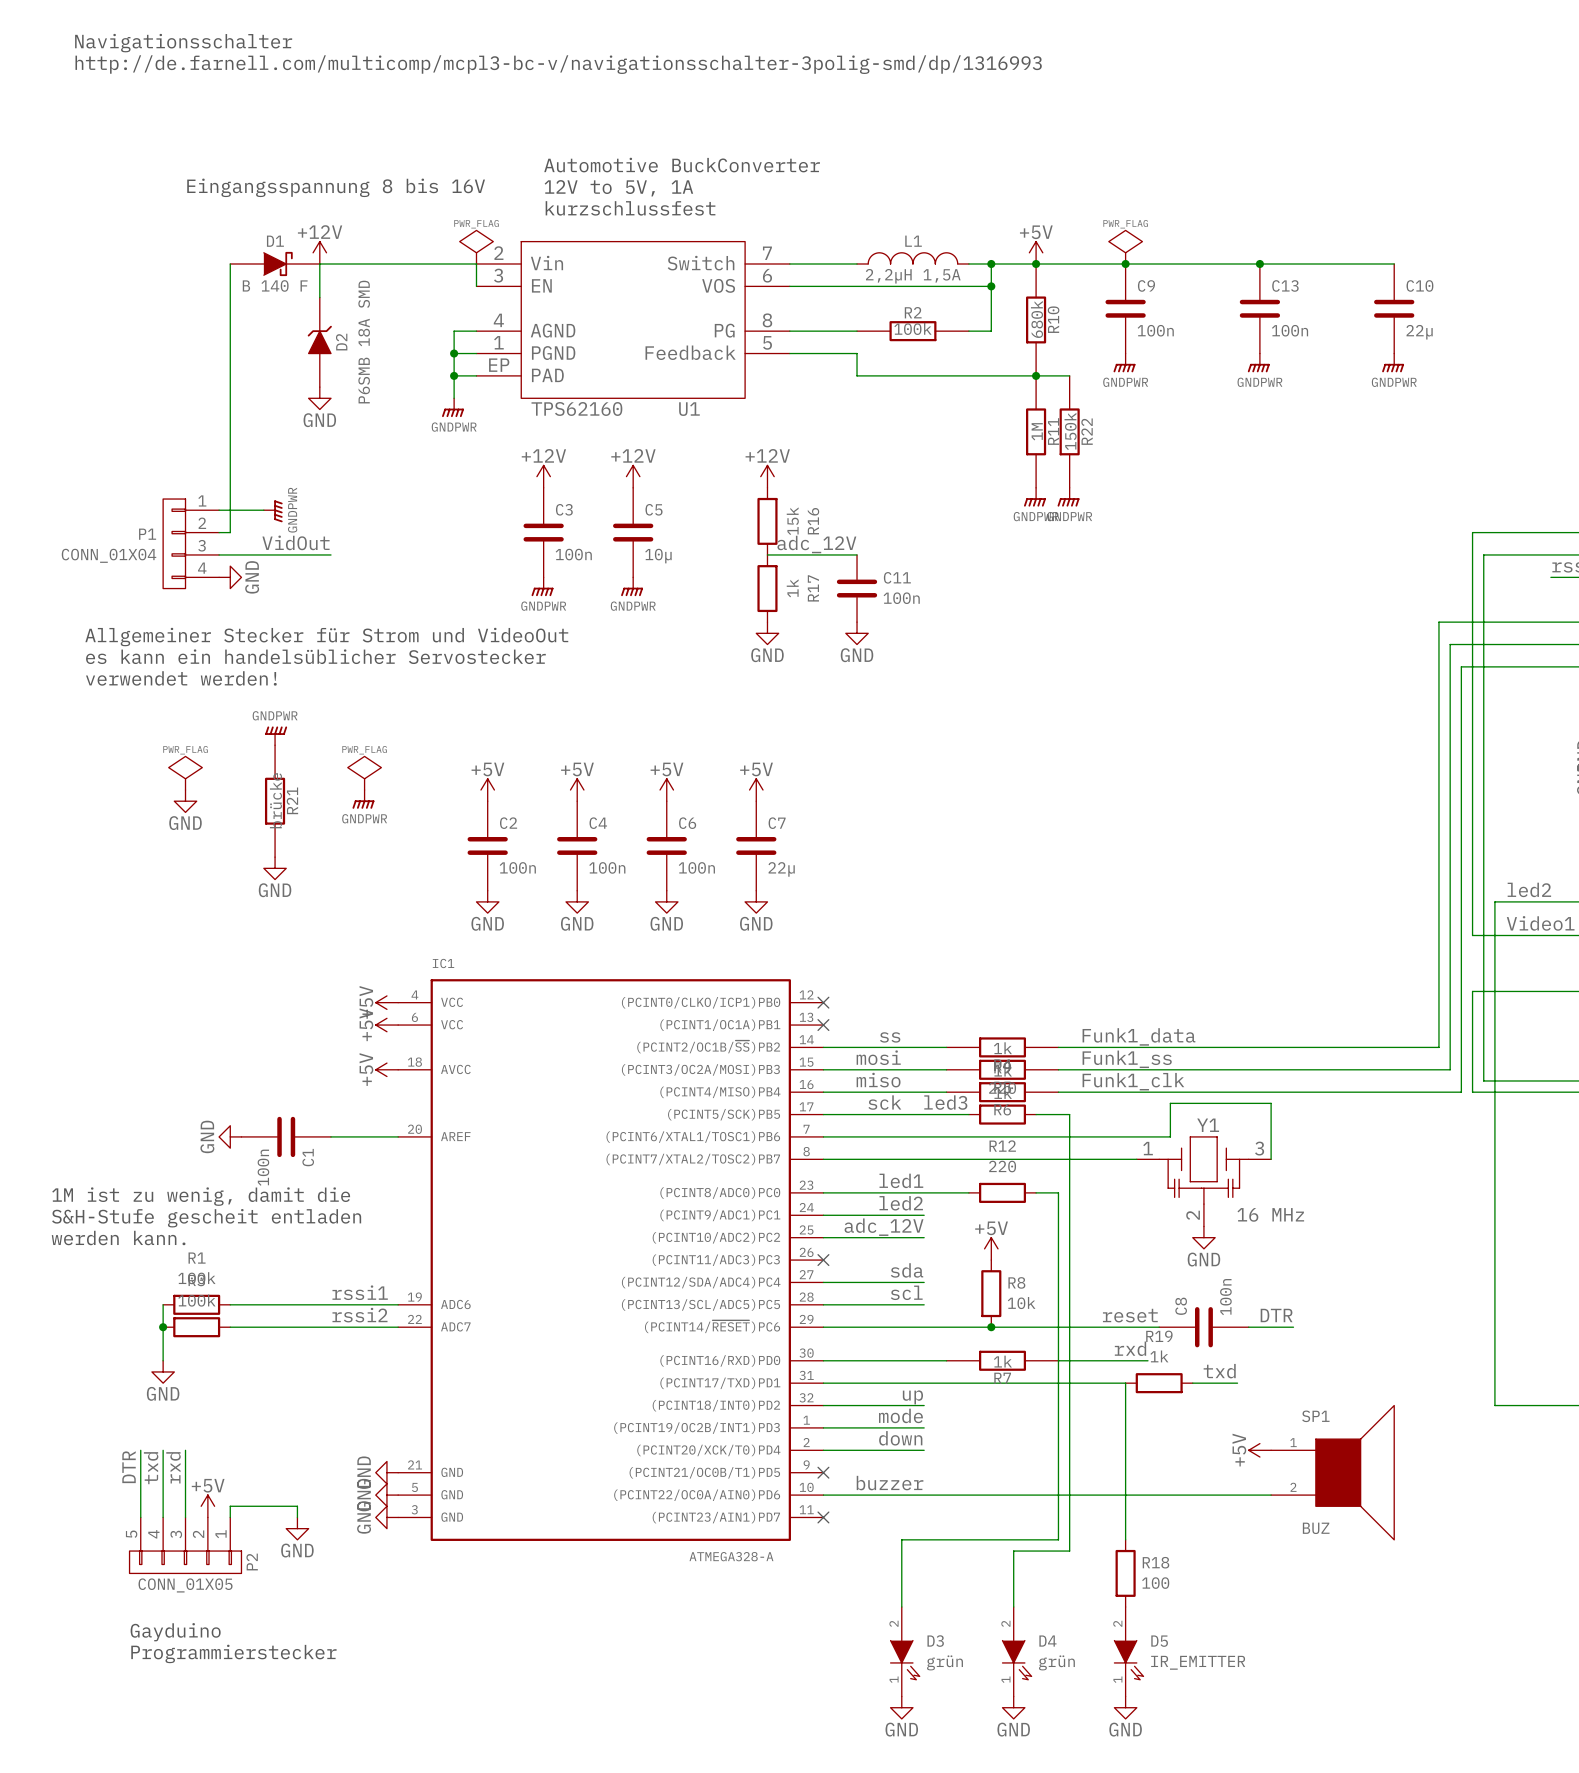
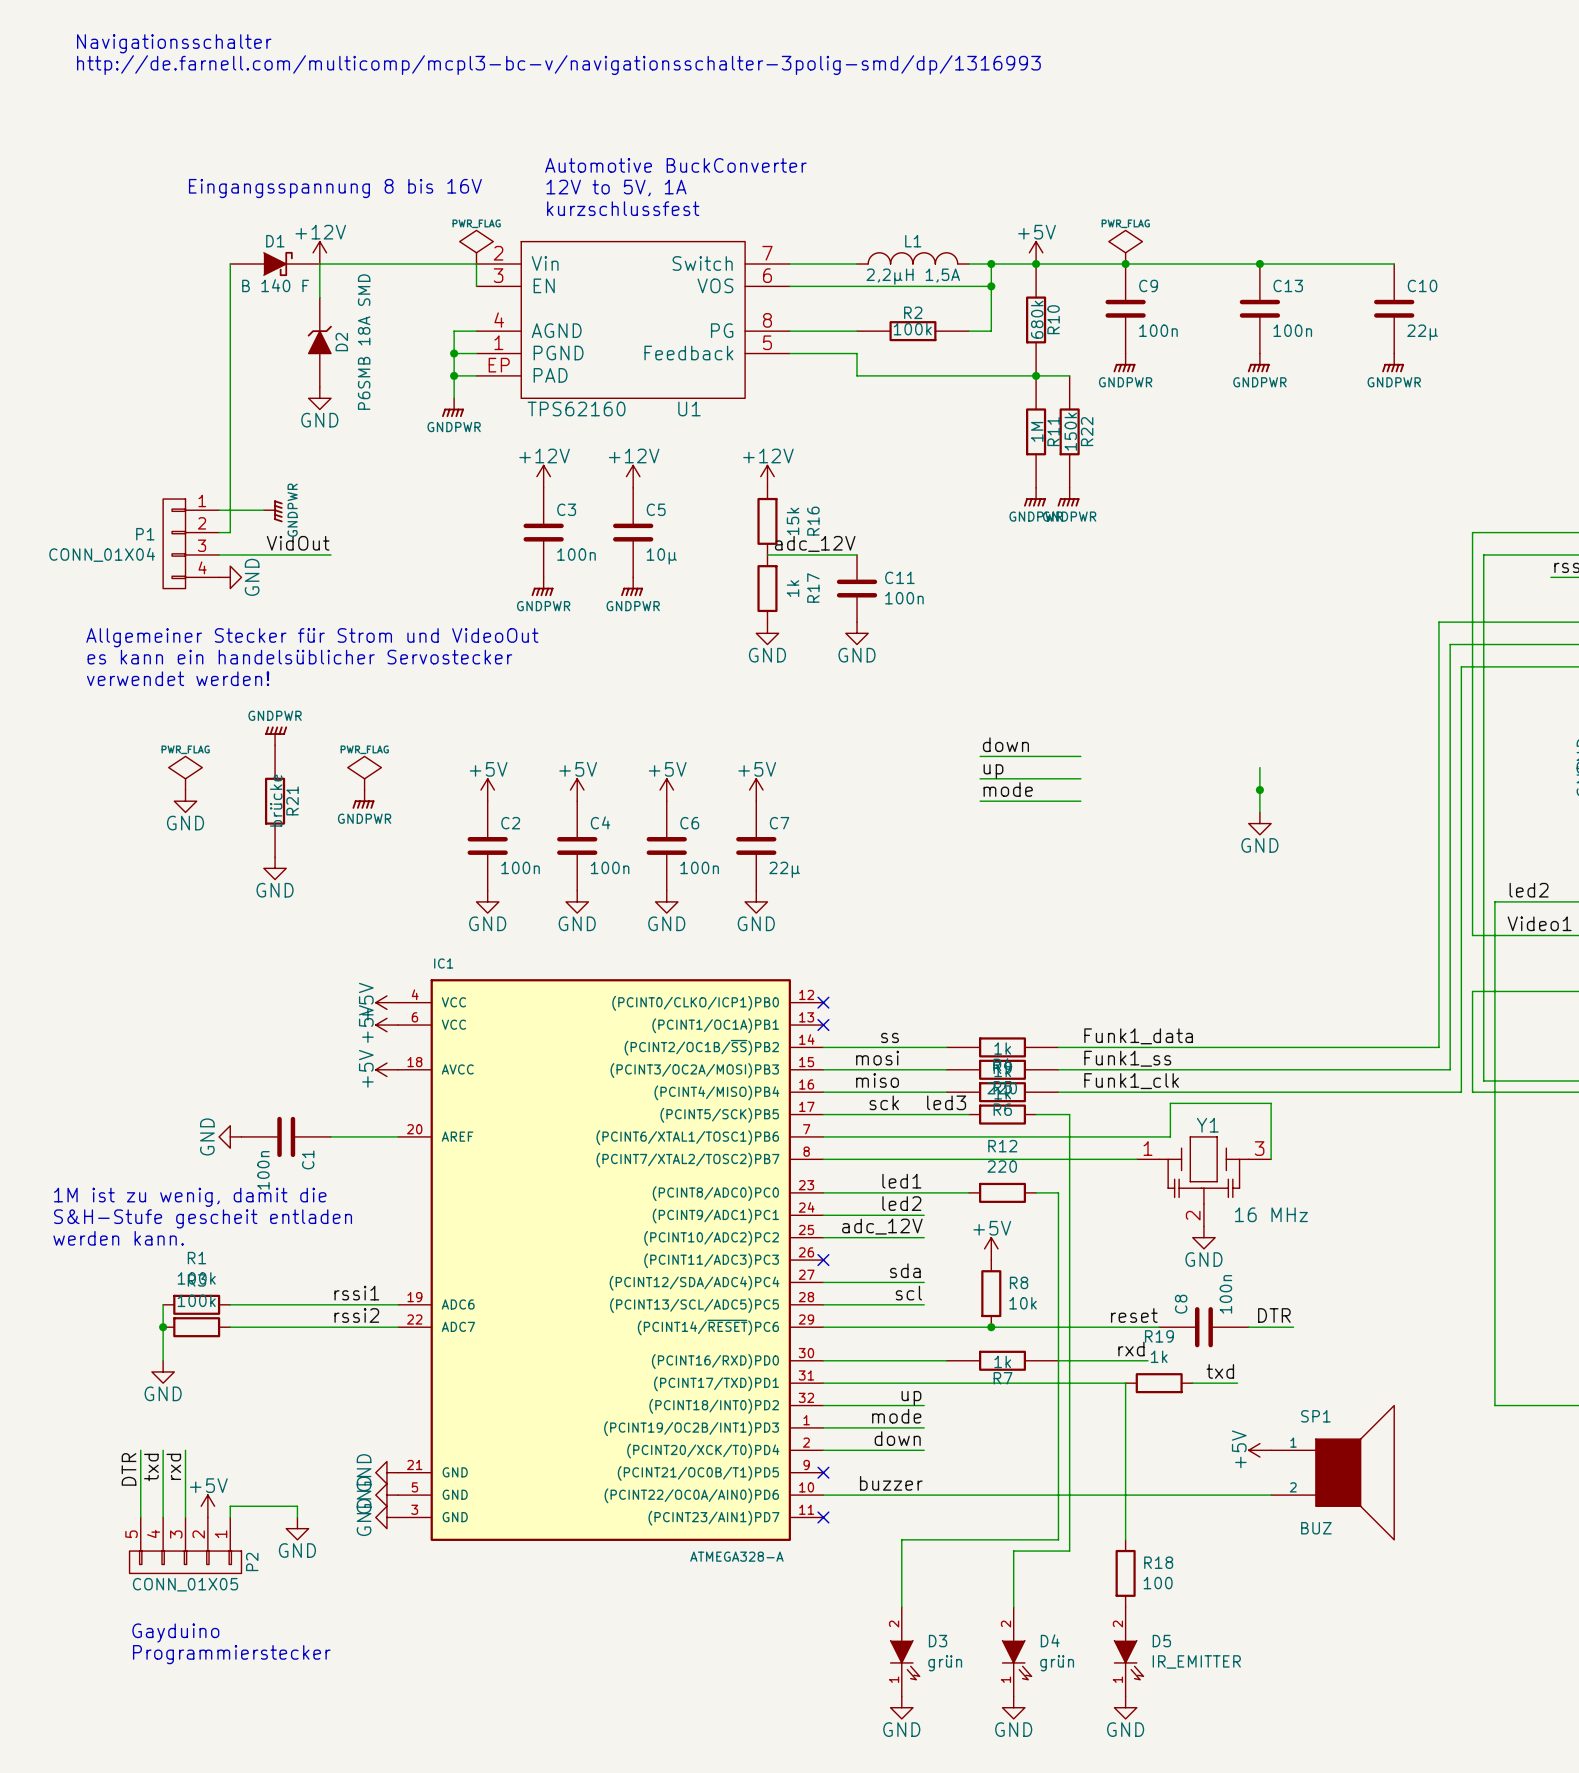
label: none -> down (1005, 744)
wire: none -> (980, 756) (1080, 756)
wire: none -> (1259, 767) (1259, 812)
label: none -> up (993, 771)
wire: none -> (980, 778) (1080, 778)
label: none -> mode (1008, 789)
junction: none -> (1259, 790)
wire: none -> (980, 801) (1080, 801)
power symbol: none -> GND (1259, 823)

